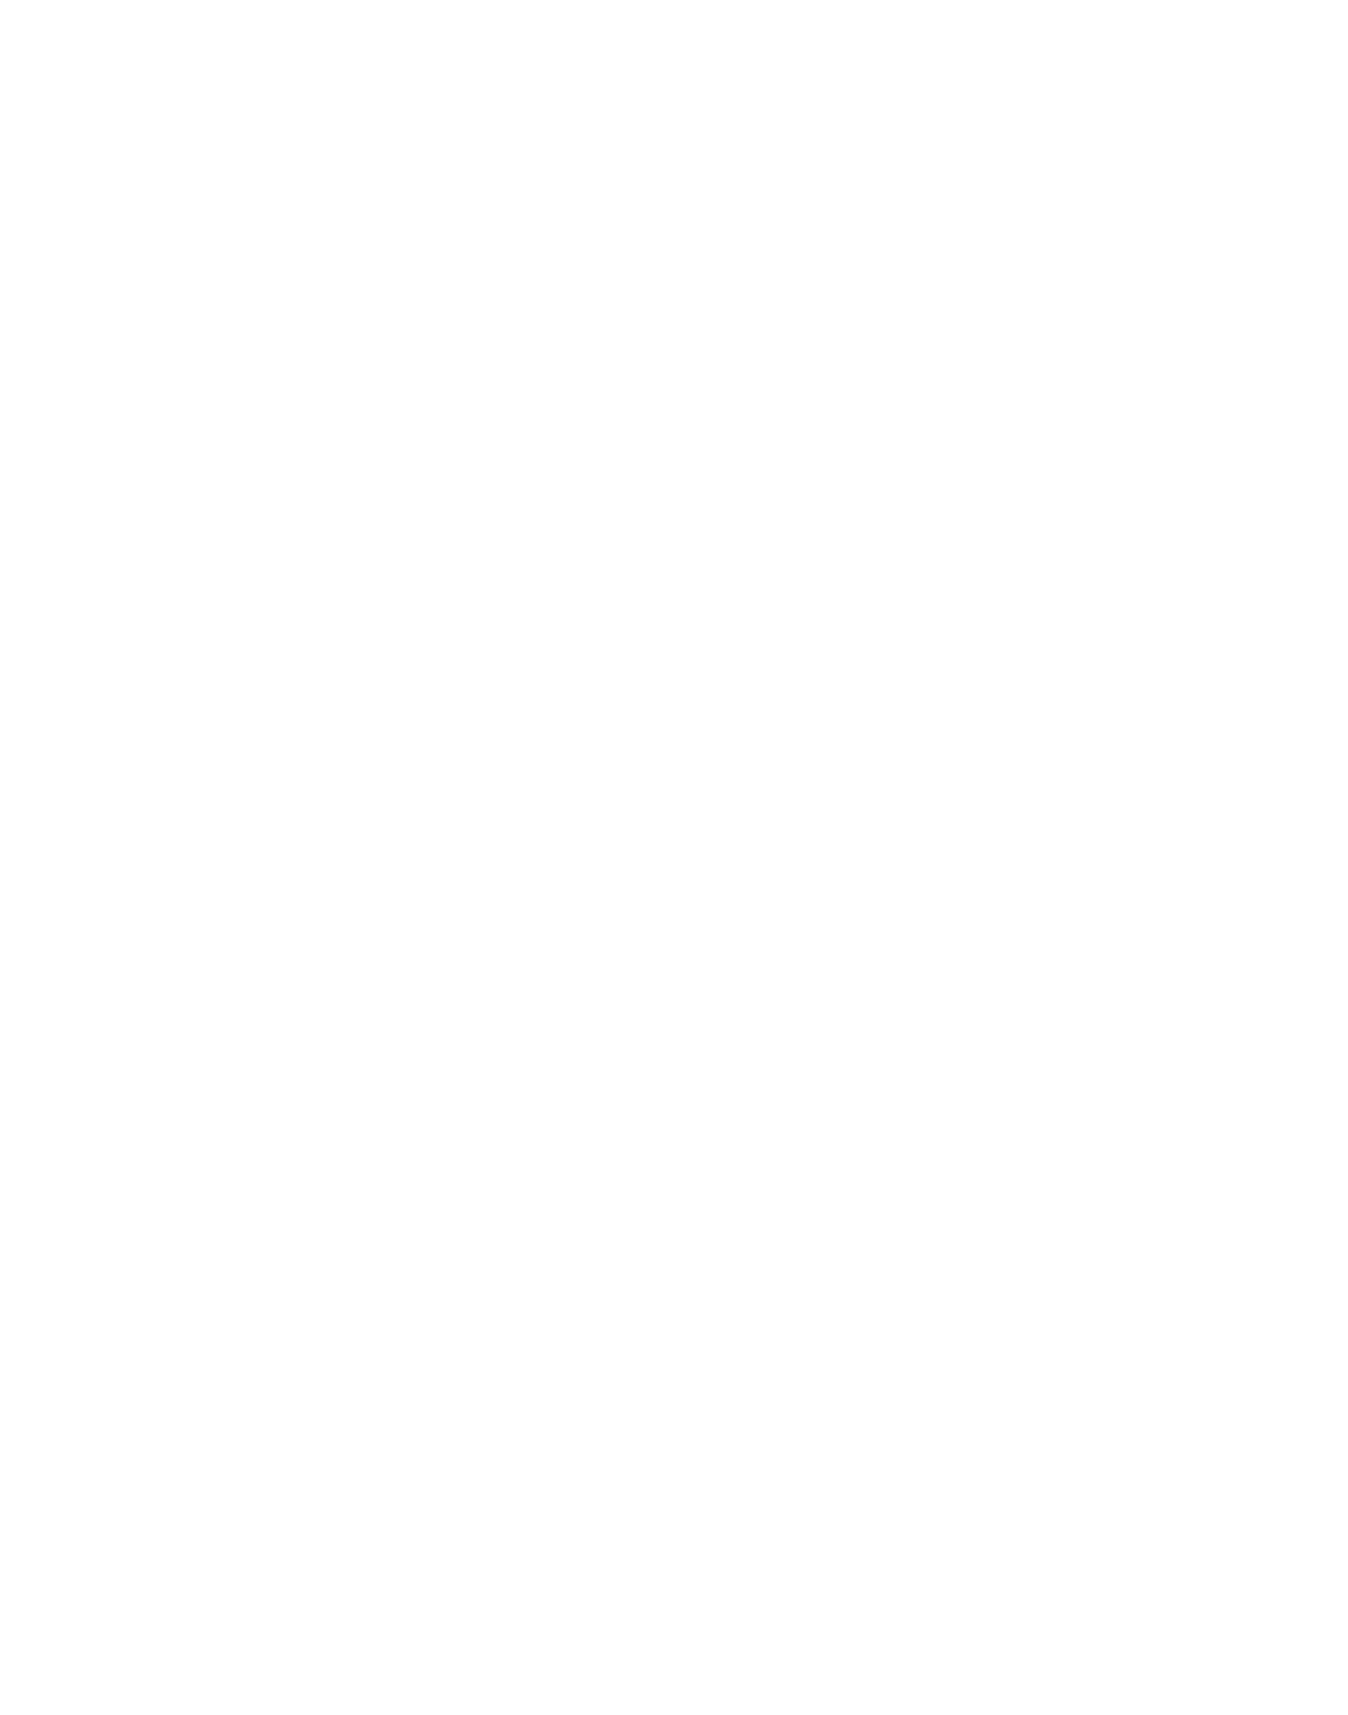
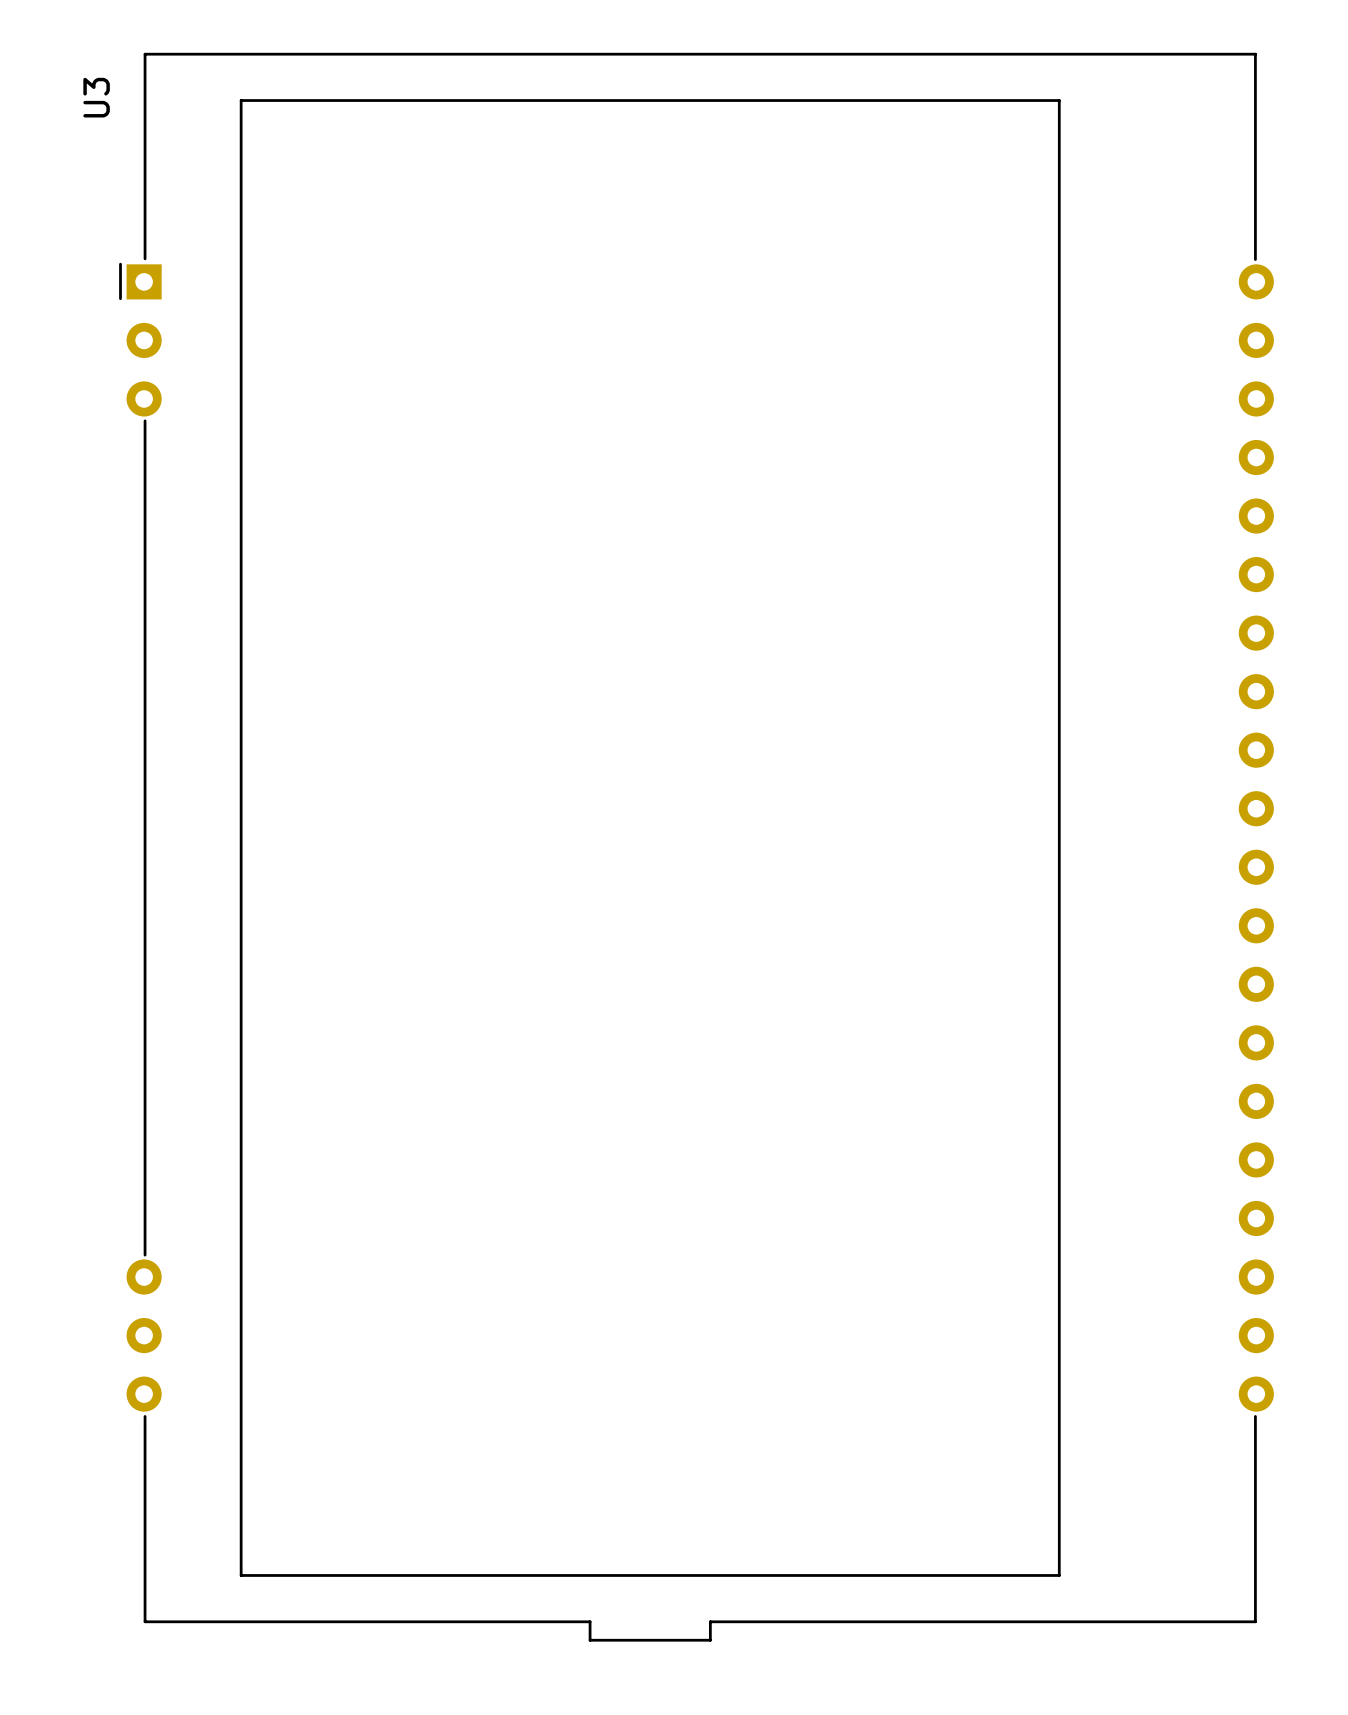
U3: none -> (696, 847)

